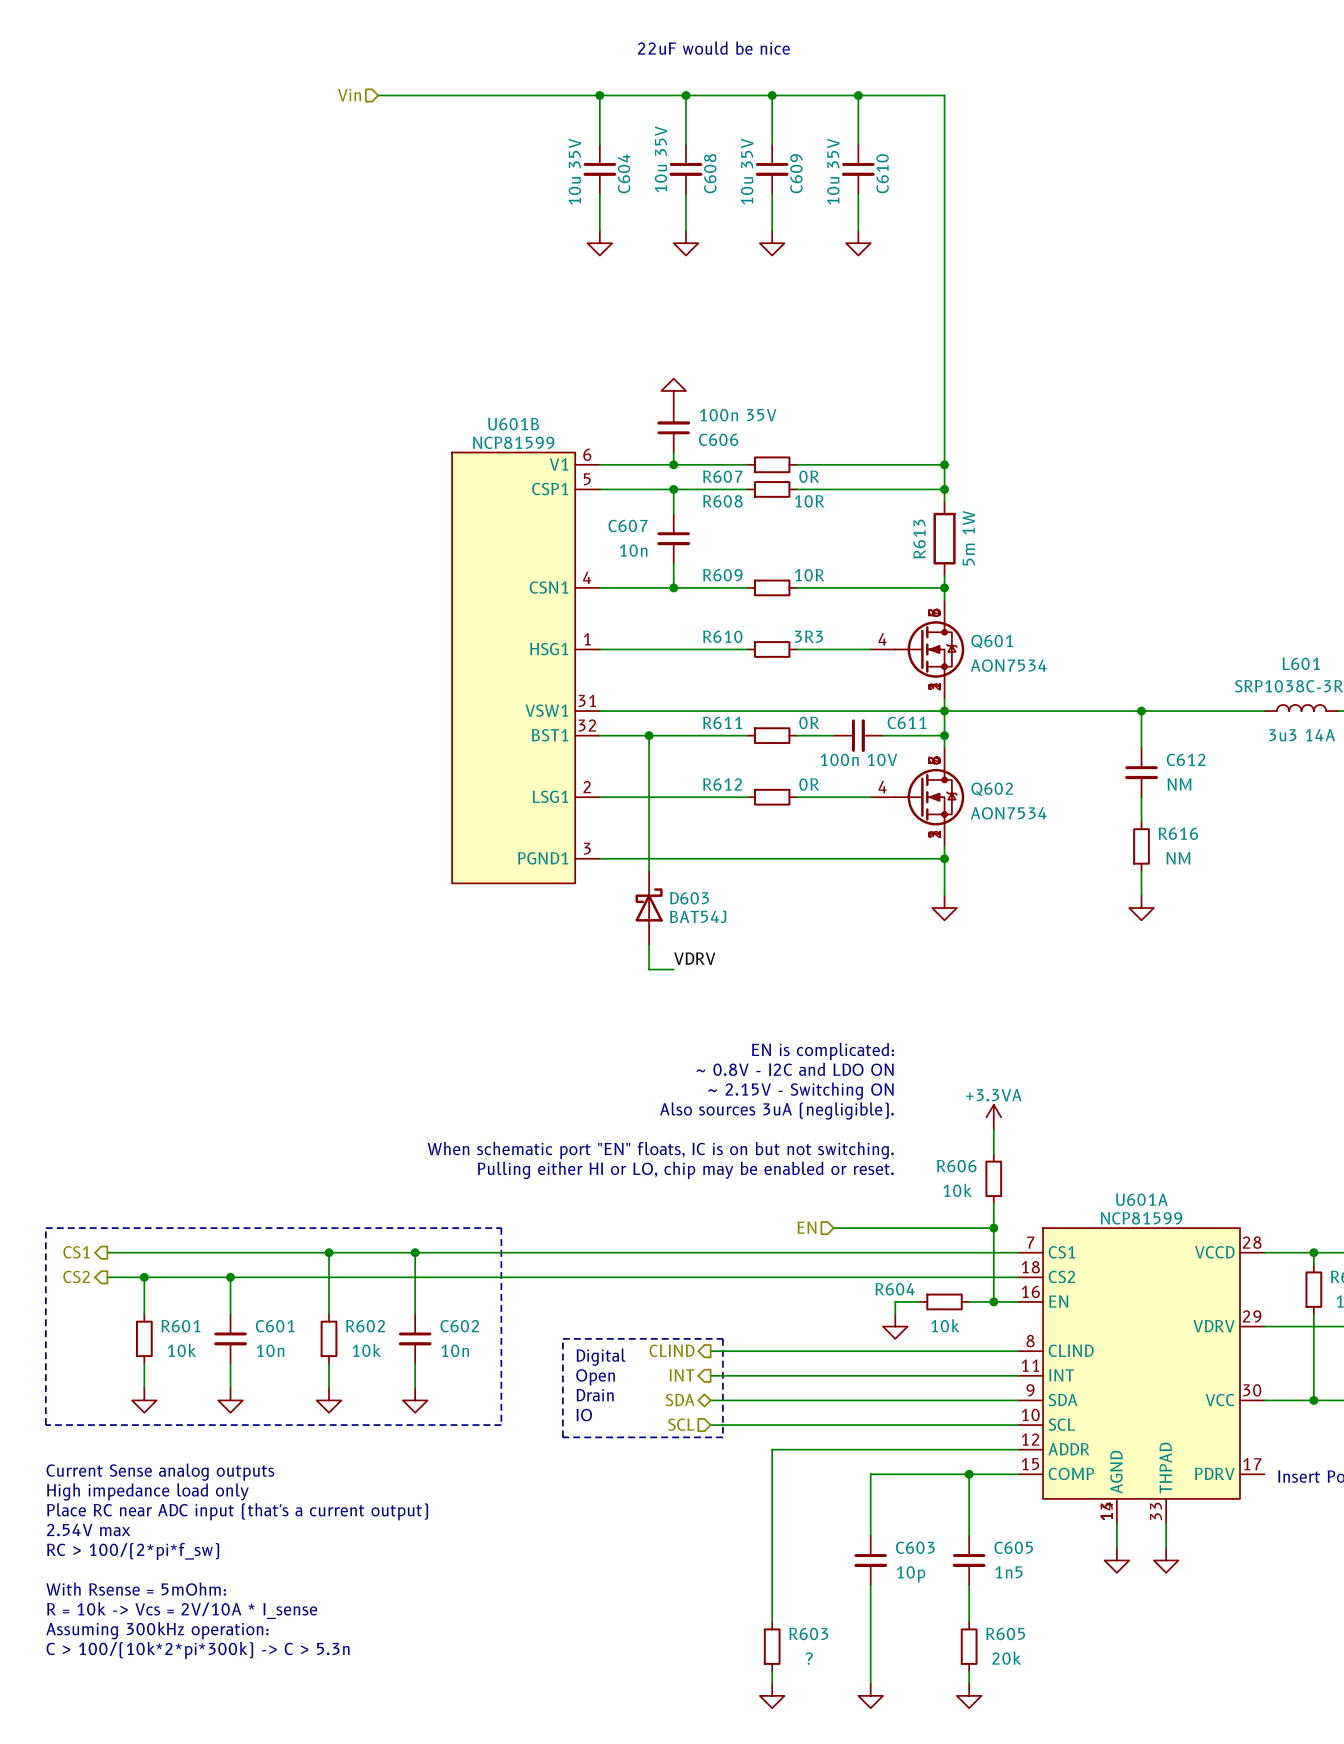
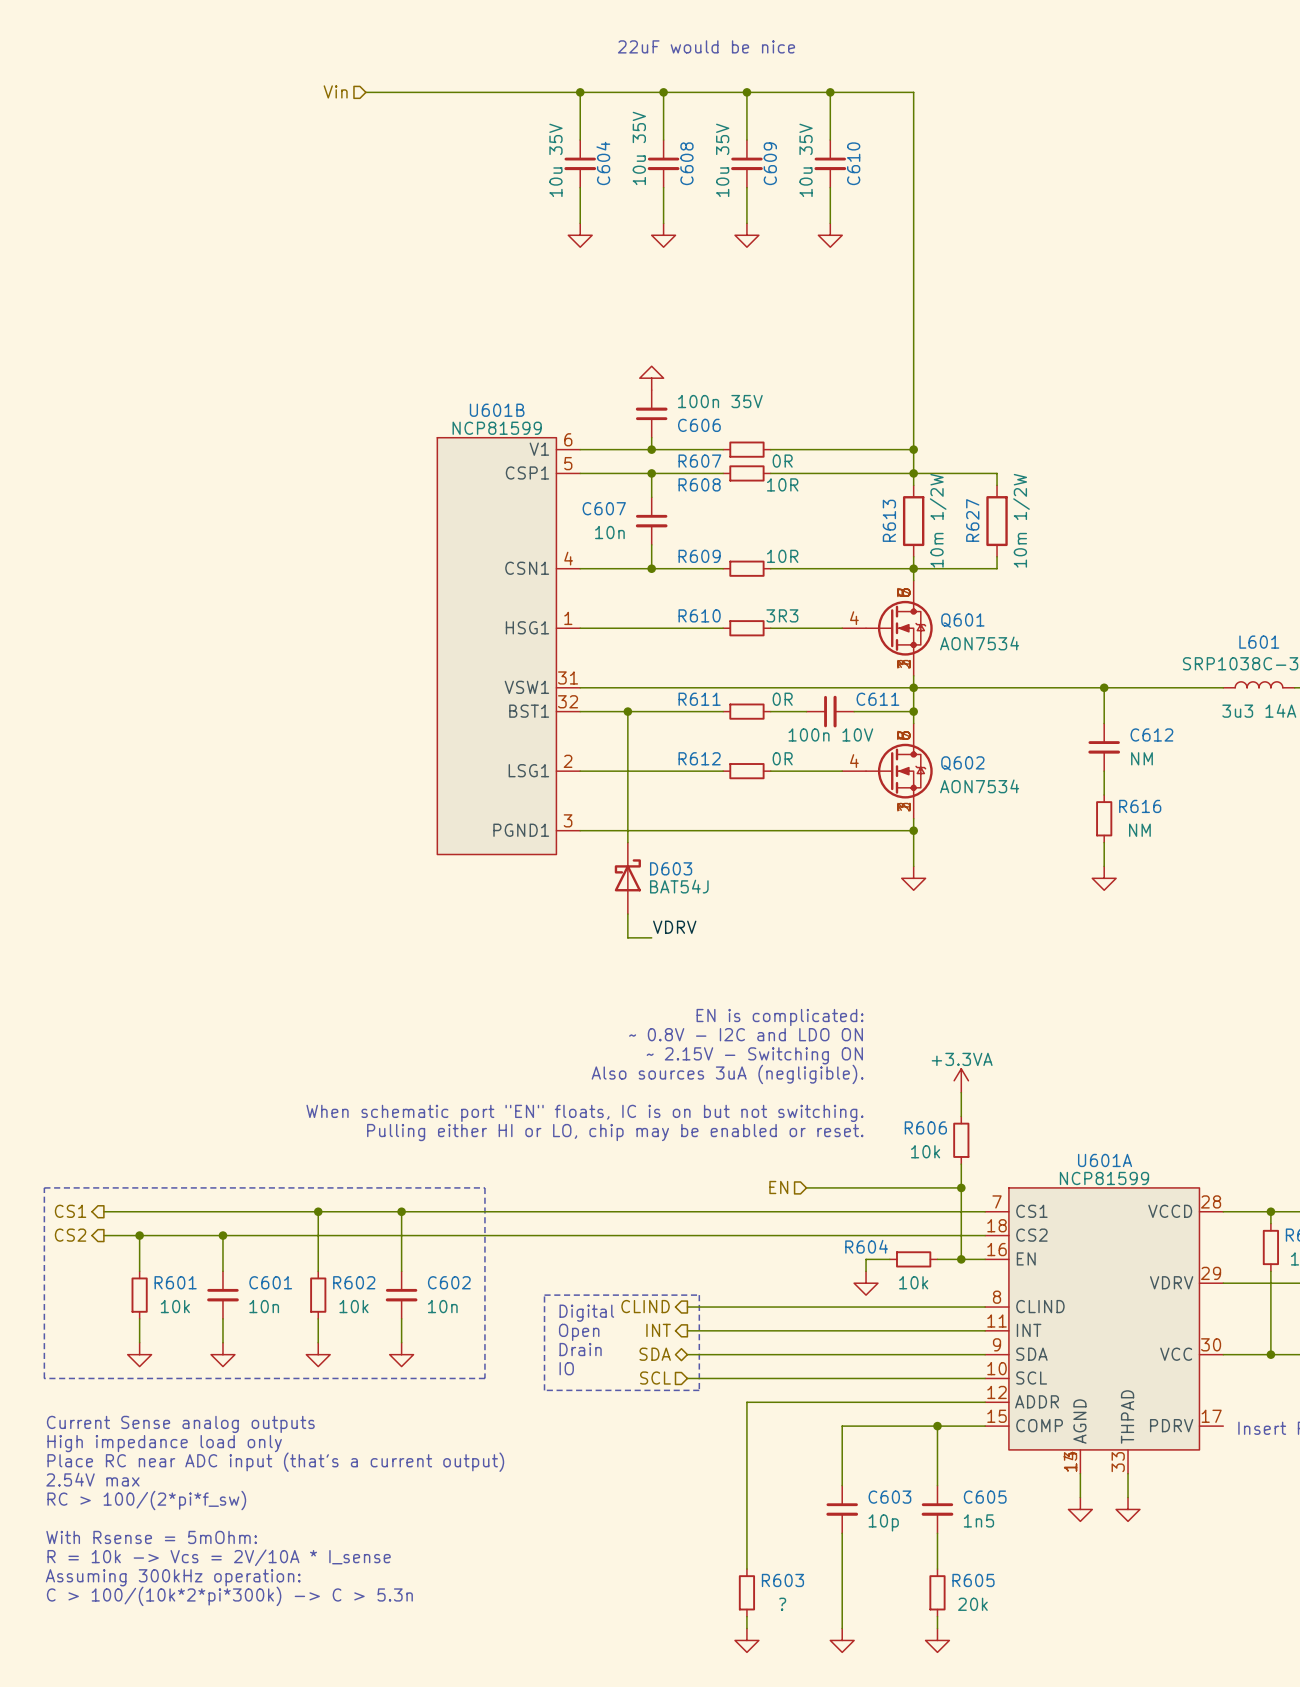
wire: none -> (913, 473) (997, 473) (997, 485)
R613 value: 5m 1W (968, 538) -> 10m 1/2W (938, 520)
R627: none -> 10m 1/2W (997, 521)
wire: none -> (997, 556) (997, 568) (913, 568)

